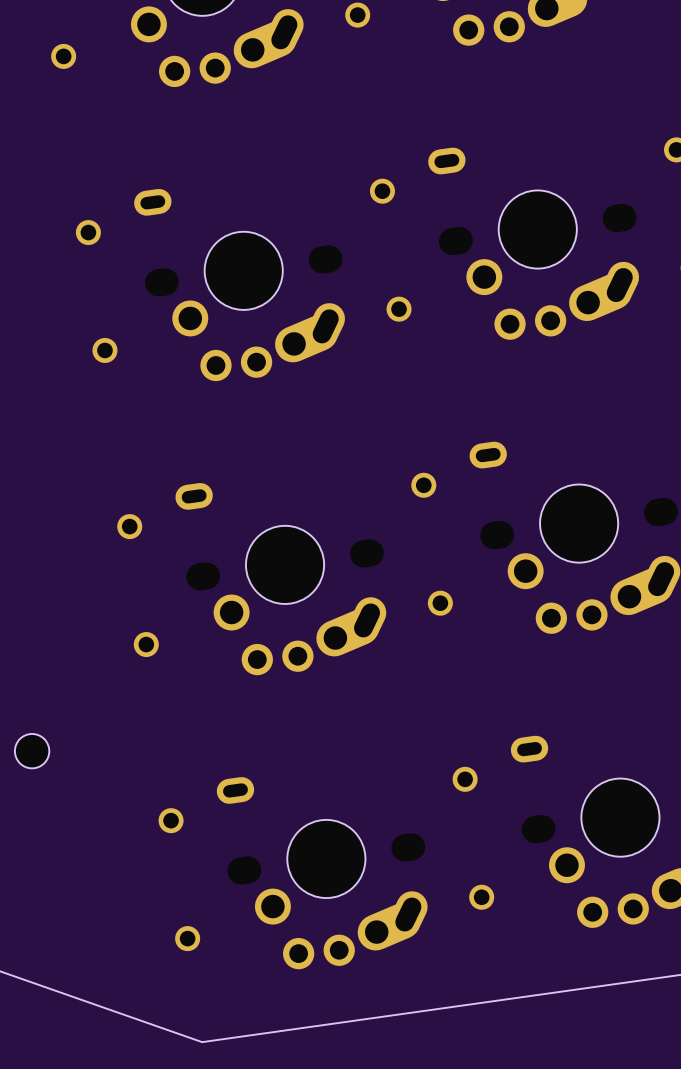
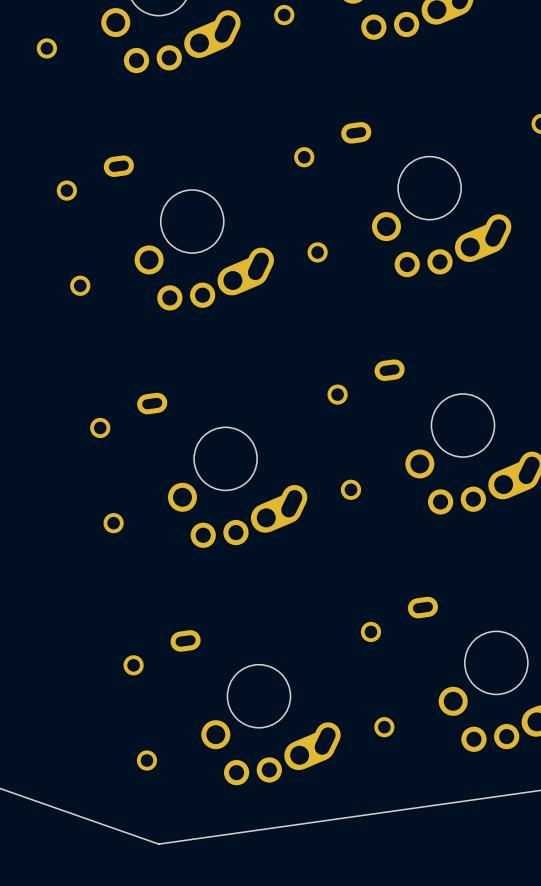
part: (32, 751) -> none

